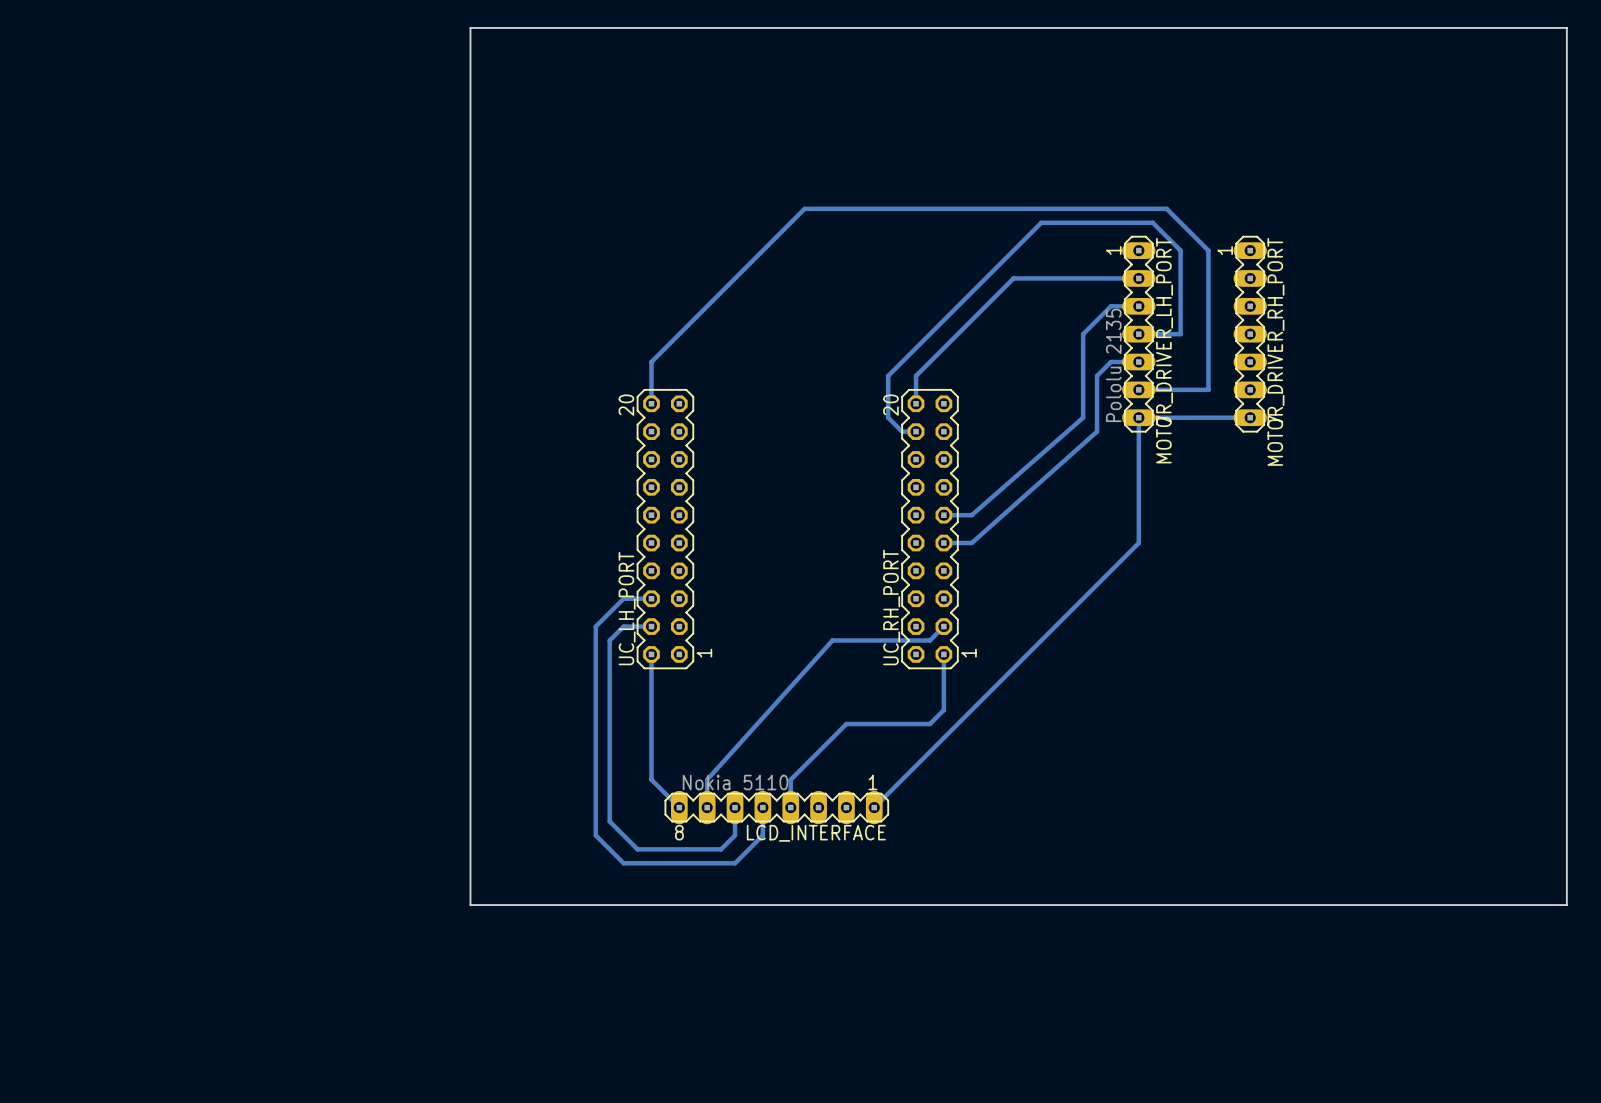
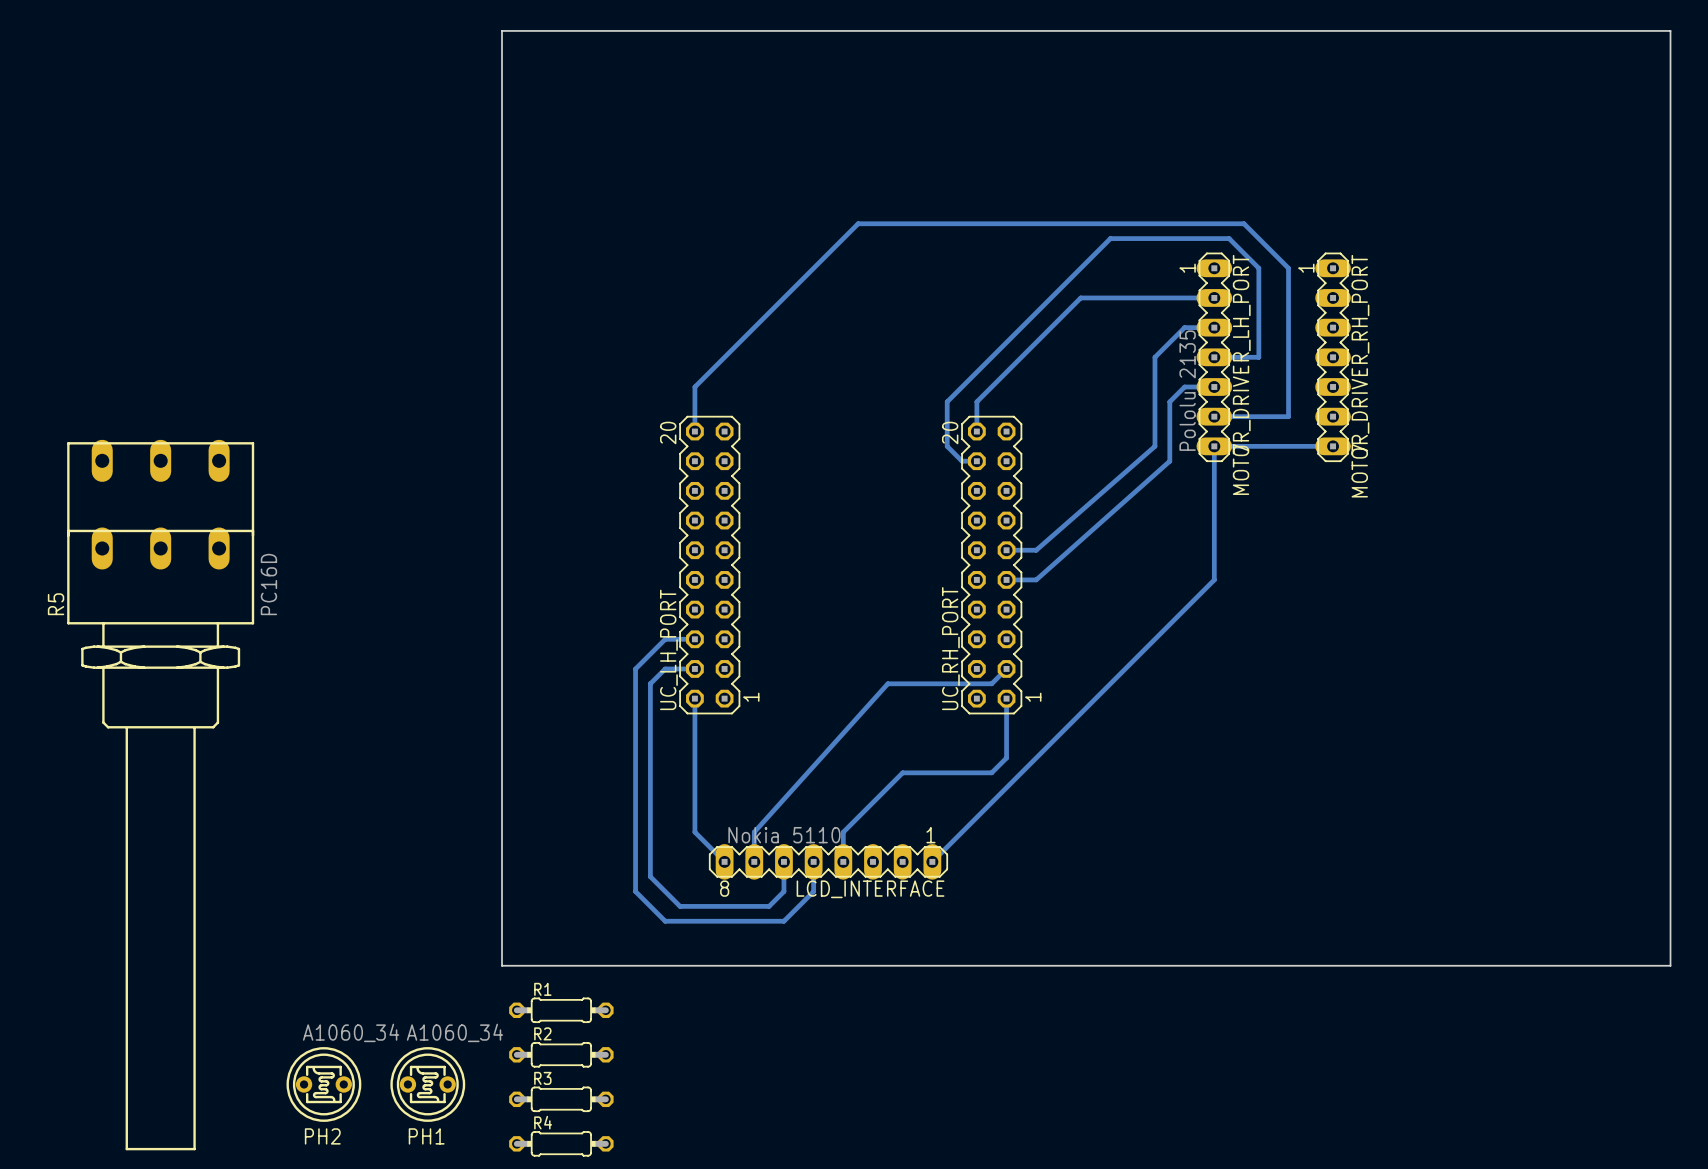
R5: none -> PC16D (160, 795)
R1: none -> (561, 1010)
R2: none -> (561, 1054)
PH2: none -> A1060_34 (323, 1084)
PH1: none -> A1060_34 (427, 1084)
R3: none -> (561, 1099)
R4: none -> (561, 1143)

